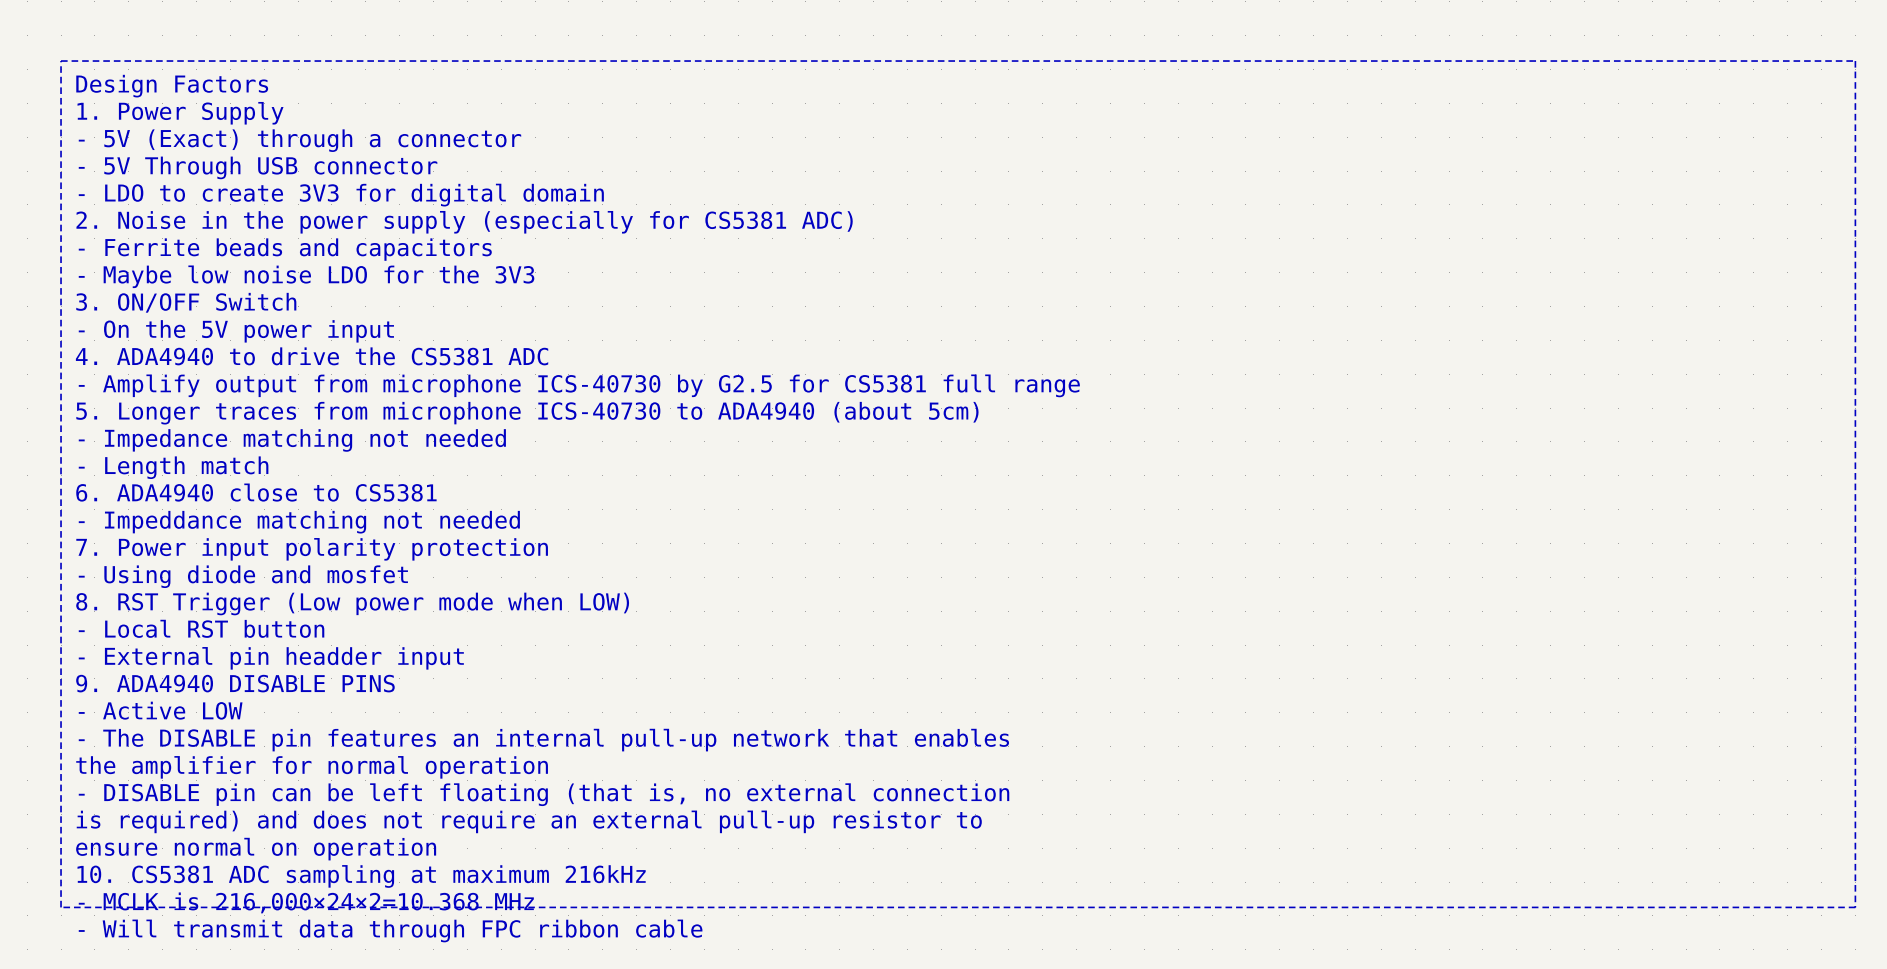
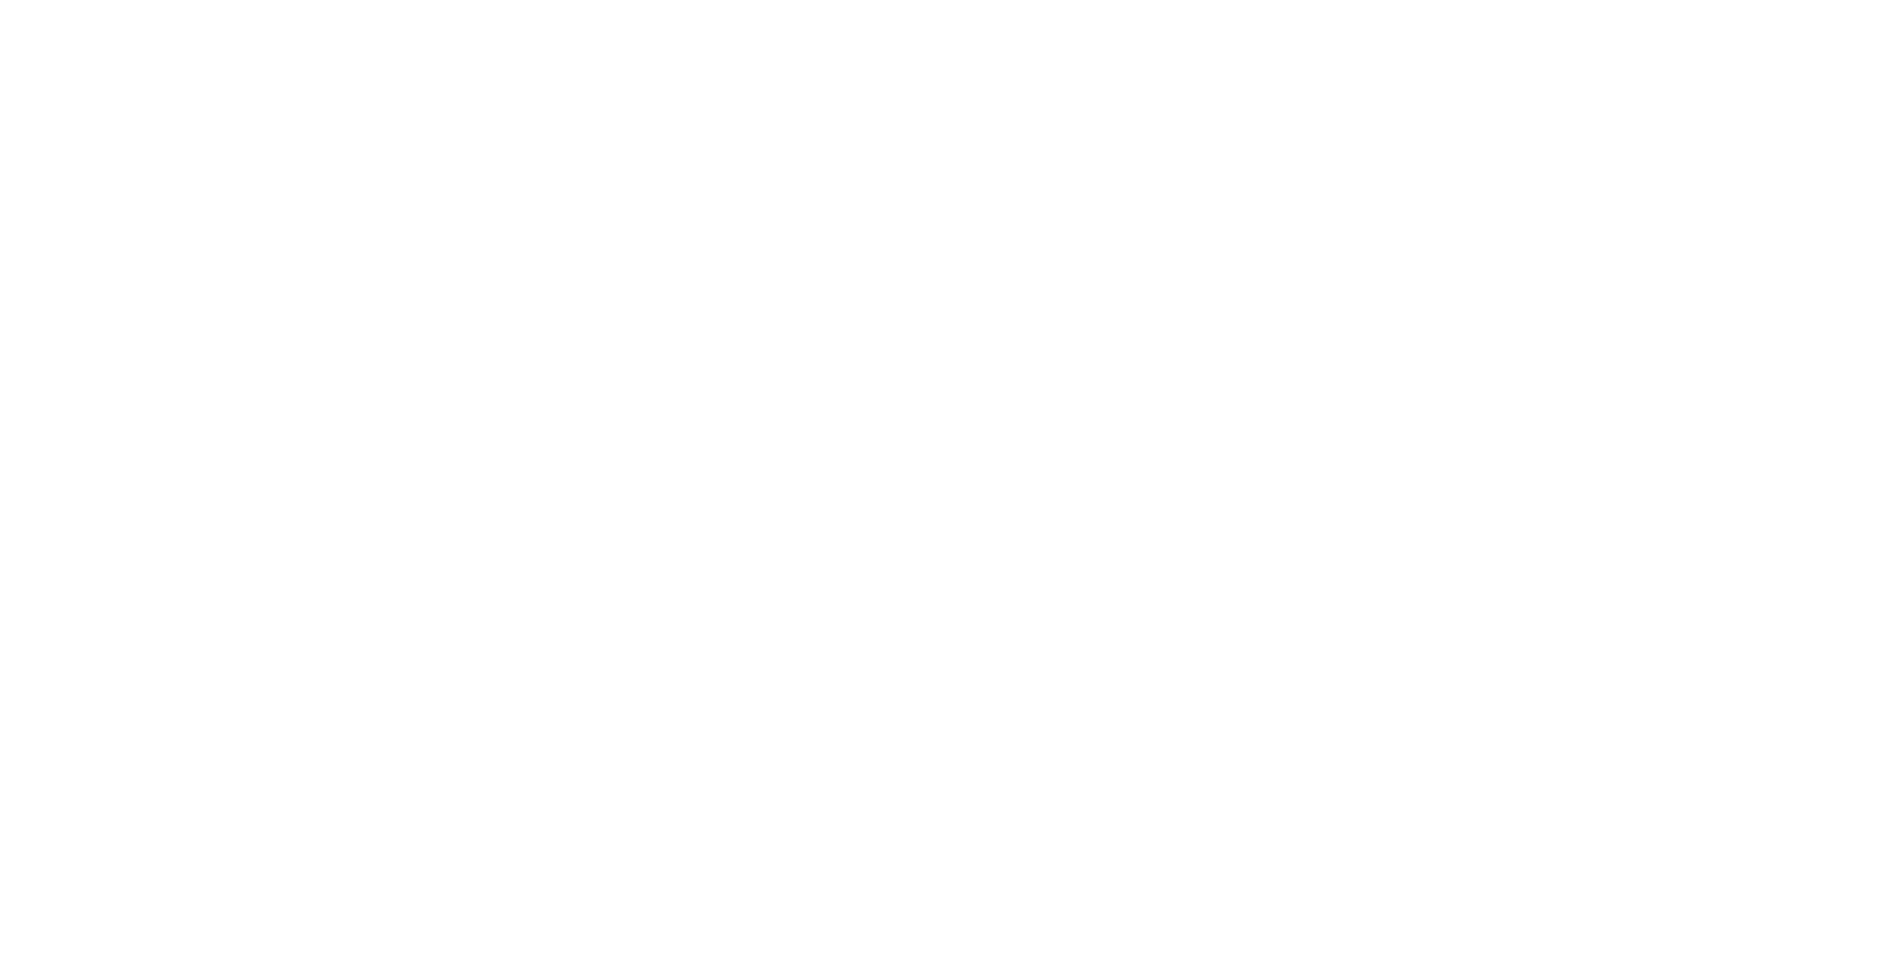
line: (61, 61) (1855, 61) (1855, 907) (61, 907) (61, 61) -> none
text: Design Factors (172, 86) -> none
text: 1. Power Supply (180, 113) -> none
text: - 5V (Exact) through a connector (299, 140) -> none
text: - 5V Through USB connector (258, 167) -> none
text: - LDO to create 3V3 for digital domain (341, 195) -> none
text: 2. Noise in the power supply (especially for CS5381 ADC) (464, 222) -> none
text: - Ferrite beads and capacitors (285, 249) -> none
text: - Maybe low noise LDO for the 3V3 (306, 276) -> none
text: 3. ON/OFF Switch (186, 302) -> none
text: - On the 5V power input (236, 331) -> none
text: 4. ADA4940 to drive the CS5381 ADC (312, 356) -> none
text: - Amplify output from microphone ICS-40730 by G2.5 for CS5381 full range (579, 385) -> none
text: 5. Longer traces from microphone ICS-40730 to ADA4940 (about 5cm) (527, 413) -> none
text: - Impedance matching not needed (292, 440) -> none
text: - Length match (173, 467) -> none
text: 6. ADA4940 close to CS5381 (256, 492) -> none
text: - Impeddance matching not needed (299, 522) -> none
text: 7. Power input polarity protection (312, 549) -> none
text: - Using diode and mosfet (243, 576) -> none
text: 8. RST Trigger (Low power mode when LOW) (352, 603) -> none
text: - Local RST button (201, 628) -> none
text: - External pin headder input (271, 658) -> none
text: 9. ADA4940 DISABLE PINS (235, 683) -> none
text: - Active LOW (160, 710) -> none
text: - The DISABLE pin features an internal pull-up network that enables (543, 740) -> none
text: the amplifier for normal operation (312, 767) -> none
text: - DISABLE pin can be left floating (that is, no external connection (544, 794) -> none
text: is required) and does not require an external pull-up resistor to (529, 821) -> none
text: ensure normal on operation (256, 849) -> none
text: 10. CS5381 ADC sampling at maximum 216kHz (361, 876) -> none
text: - MCLK is 216,000×24×2=10.368 MHz (306, 902) -> none
text: - Will transmit data through FPC ribbon cable (390, 930) -> none

